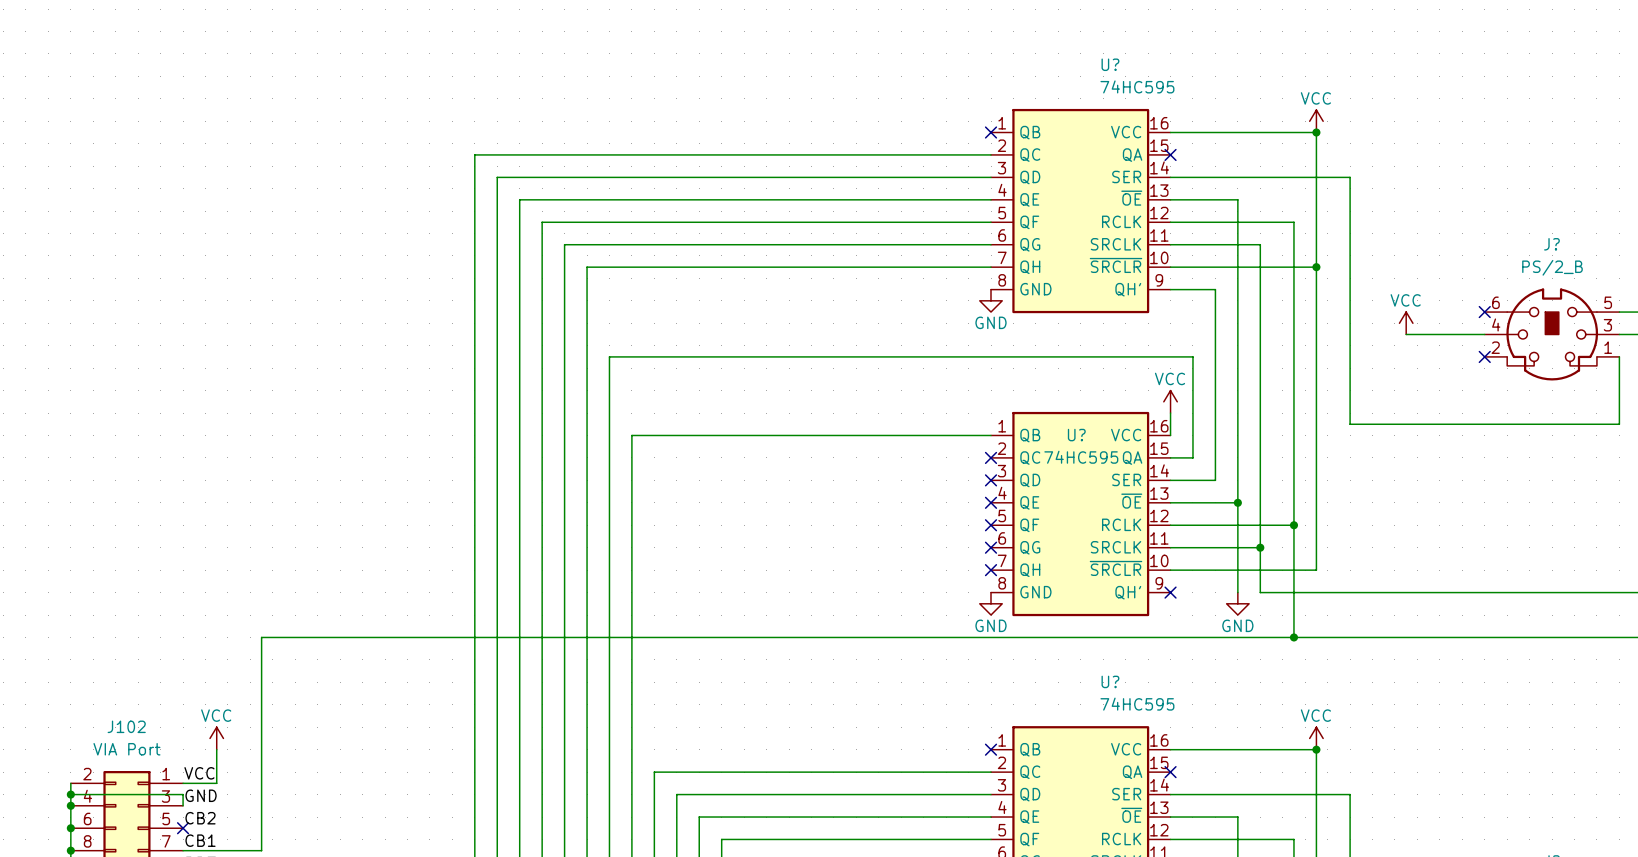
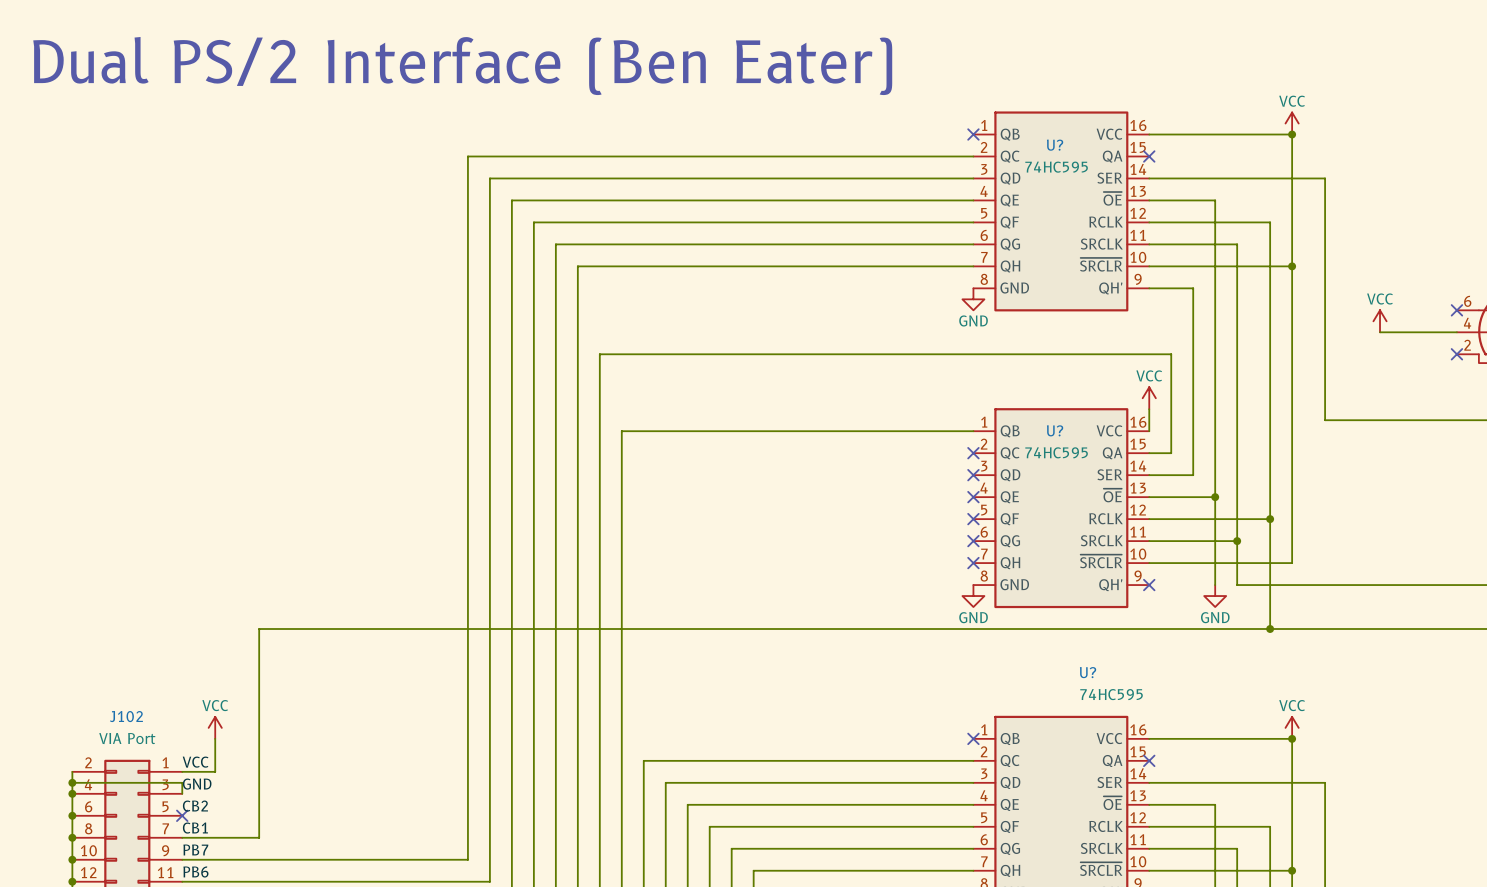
text: none -> Dual PS/2 Interface (Ben Eater) (462, 66)
U? name position: U? (1110, 64) -> U? (1055, 145)
U? value position: 74HC595 (1137, 86) -> 74HC595 (1056, 167)

